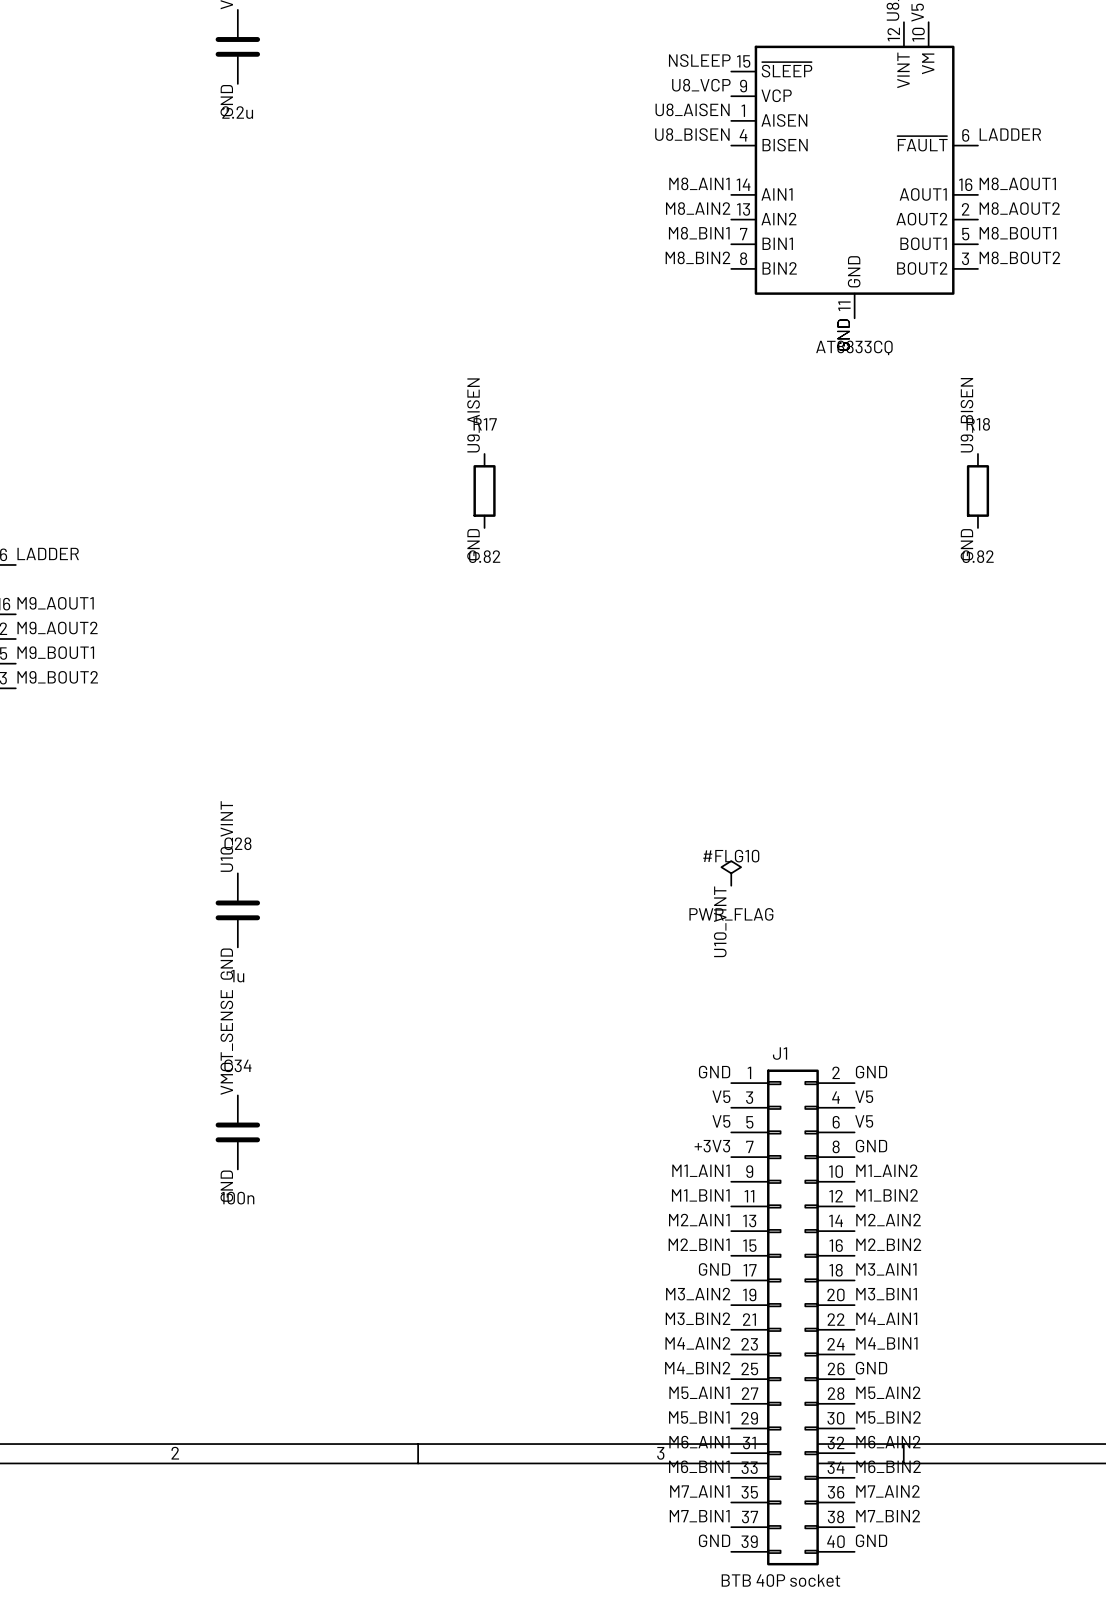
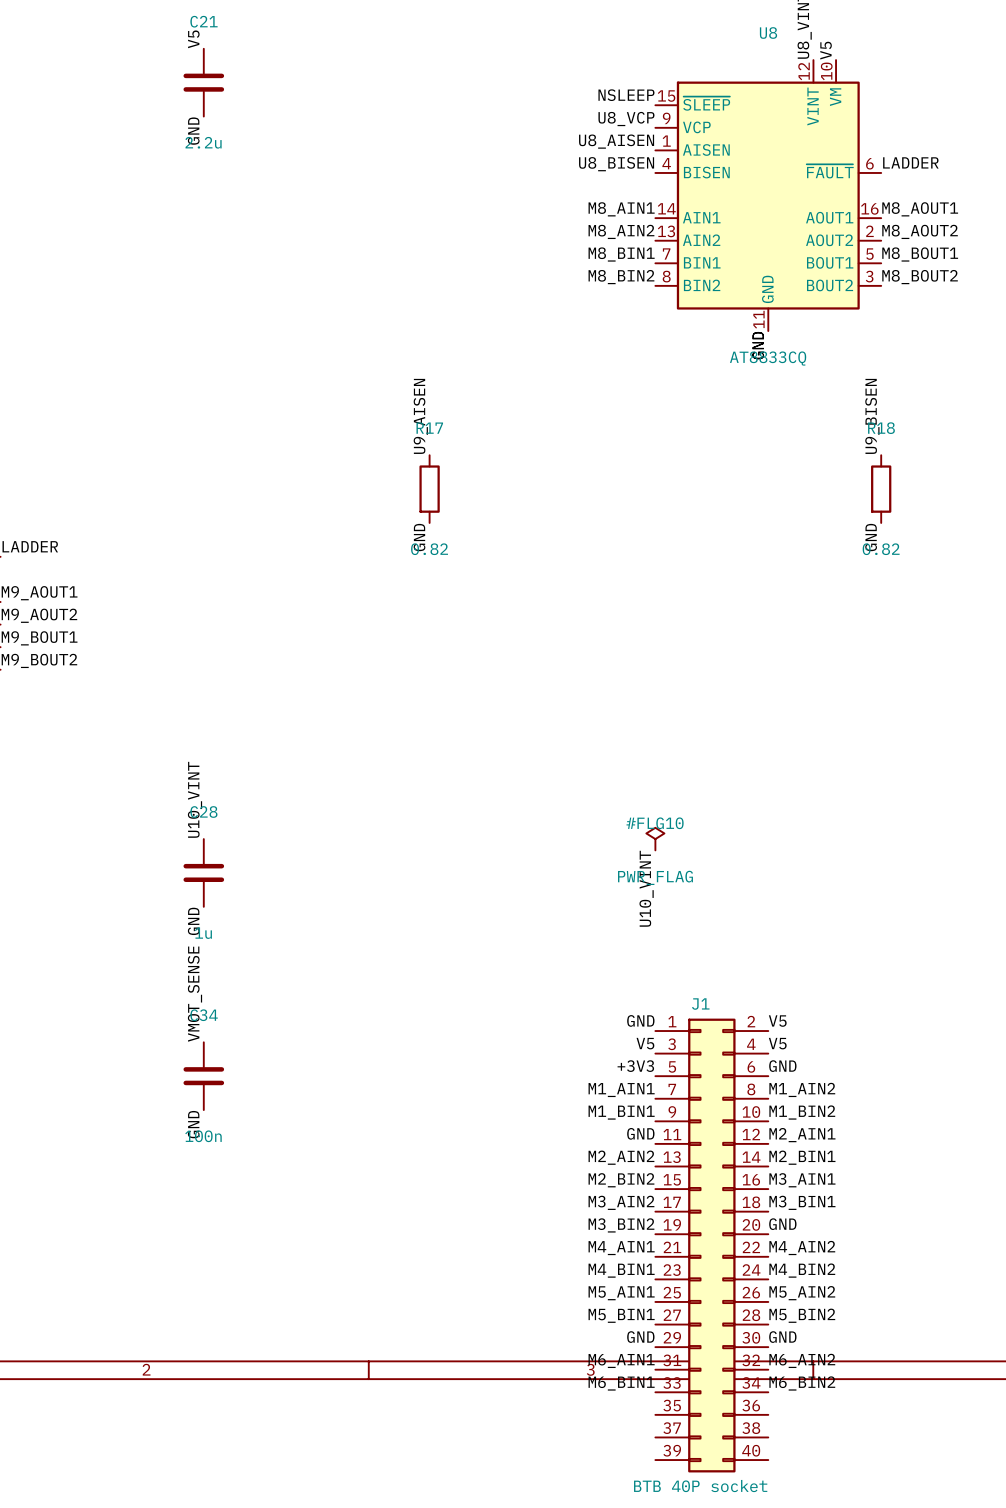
label: GND (871, 1072) -> V5 (777, 1021)
label: V5 (721, 1121) -> +3V3 (635, 1066)
label: V5 (864, 1121) -> GND (782, 1066)
label: +3V3 (712, 1146) -> M1_AIN1 (621, 1090)
label: GND (871, 1146) -> M1_AIN2 (802, 1089)
label: M1_AIN1 (700, 1170) -> M1_BIN1 (621, 1112)
label: M1_AIN2 (886, 1170) -> M1_BIN2 (802, 1112)
label: M1_BIN1 (700, 1195) -> GND (640, 1133)
label: M1_BIN2 (887, 1195) -> M2_AIN1 (802, 1135)
label: M2_AIN1 (699, 1220) -> M2_AIN2 (621, 1157)
label: M2_AIN2 (888, 1220) -> M2_BIN1 (802, 1157)
label: M2_BIN1 (699, 1244) -> M2_BIN2 (621, 1180)
label: M2_BIN2 (888, 1244) -> M3_AIN1 (802, 1180)
label: GND (714, 1269) -> M3_AIN2 (621, 1202)
label: M3_AIN1 (886, 1269) -> M3_BIN1 (802, 1202)
label: M3_AIN2 (698, 1294) -> M3_BIN2 (621, 1225)
label: M3_BIN1 (886, 1294) -> GND (782, 1224)
label: M3_BIN2 (697, 1318) -> M4_AIN1 (621, 1248)
label: M4_AIN1 (886, 1318) -> M4_AIN2 (802, 1248)
label: M4_AIN2 (697, 1343) -> M4_BIN1 (621, 1270)
label: M4_BIN1 (886, 1343) -> M4_BIN2 (802, 1270)
label: M4_BIN2 (697, 1368) -> M5_AIN1 (621, 1293)
label: GND (871, 1368) -> M5_AIN2 (802, 1293)
label: M5_AIN1 (699, 1392) -> M5_BIN1 (621, 1315)
label: M5_AIN2 (888, 1392) -> M5_BIN2 (802, 1315)
label: M5_BIN1 (699, 1417) -> GND (640, 1337)
label: M5_BIN2 (888, 1417) -> GND (782, 1337)
label: M7_AIN1 (699, 1491) -> none
label: M7_AIN2 (887, 1491) -> none
label: M7_BIN1 (699, 1516) -> none
label: M7_BIN2 (888, 1516) -> none
label: GND (714, 1540) -> none
label: GND (871, 1540) -> none

